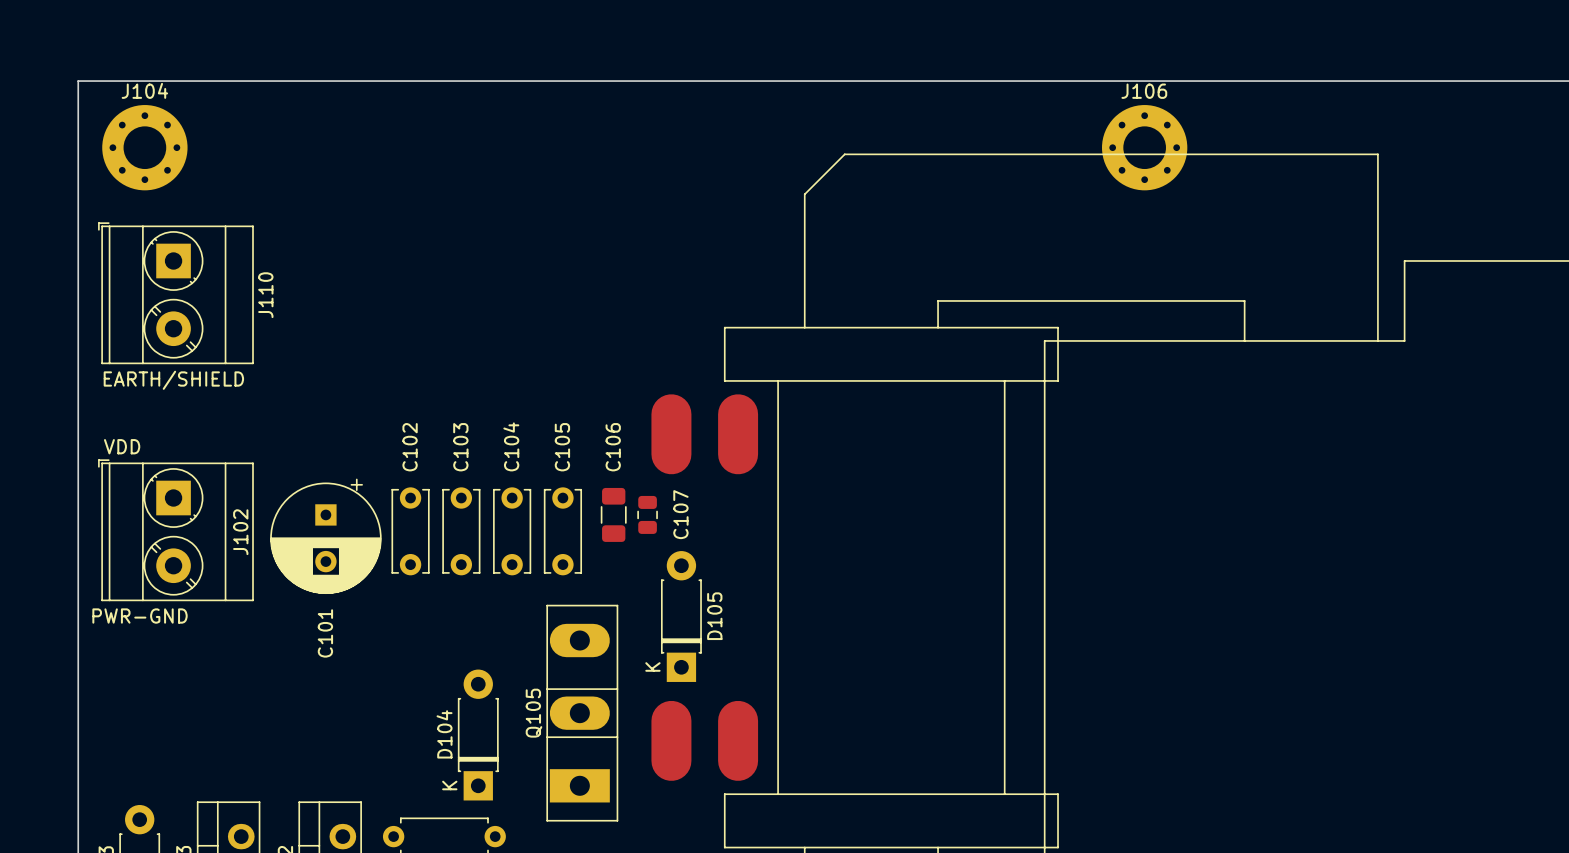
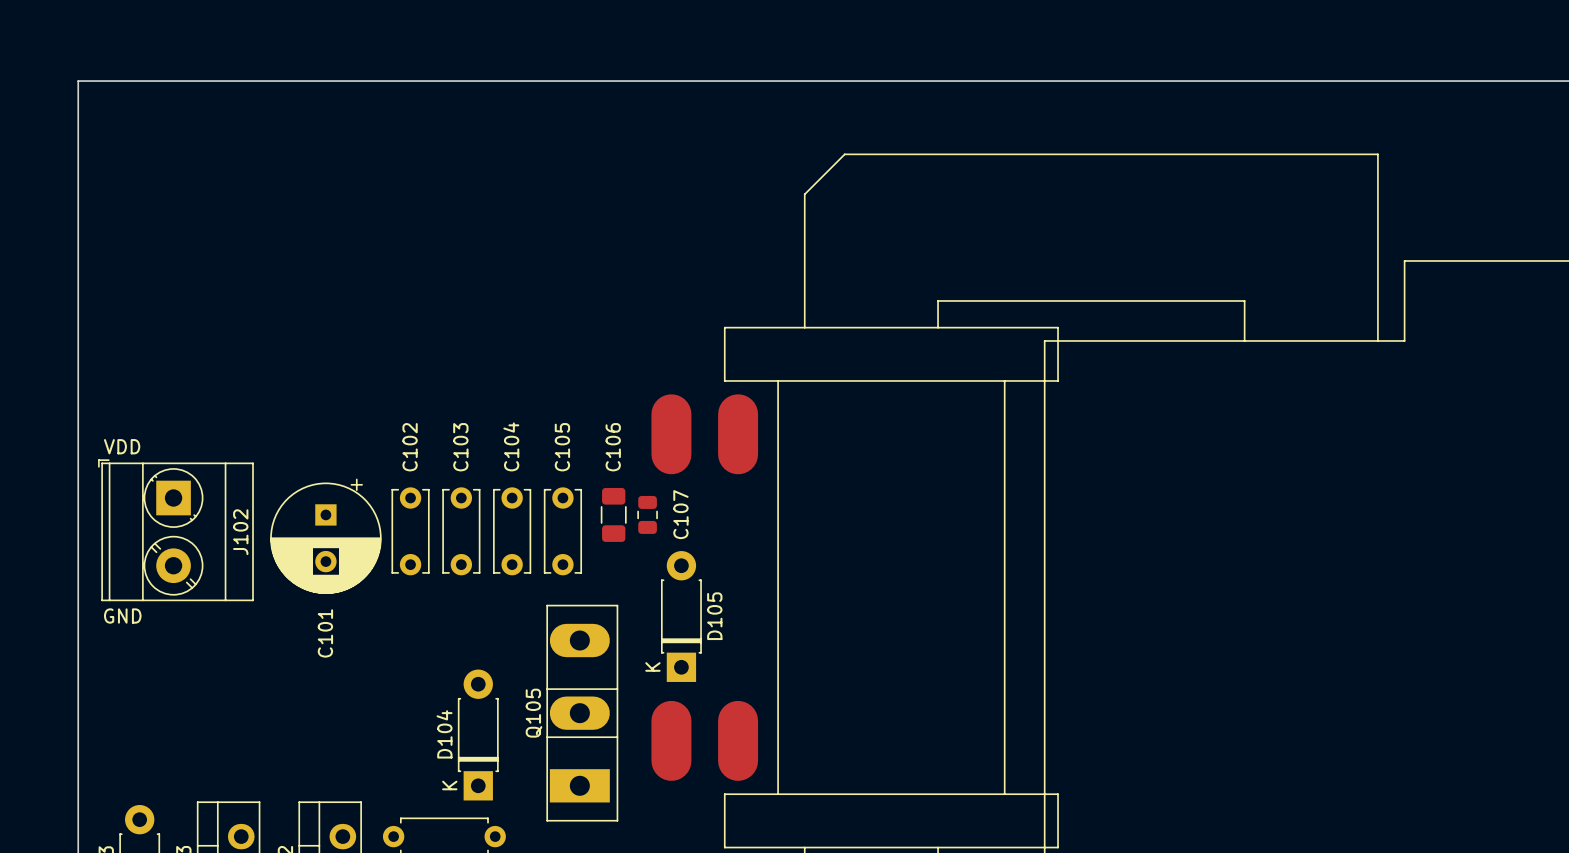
J104: (144, 147) -> none
J106: (1144, 147) -> none
J110: (175, 293) -> none
text: EARTH/SHIELD (173, 380) -> none
text: none -> GND (122, 616)
text: PWR-GND (140, 616) -> none

